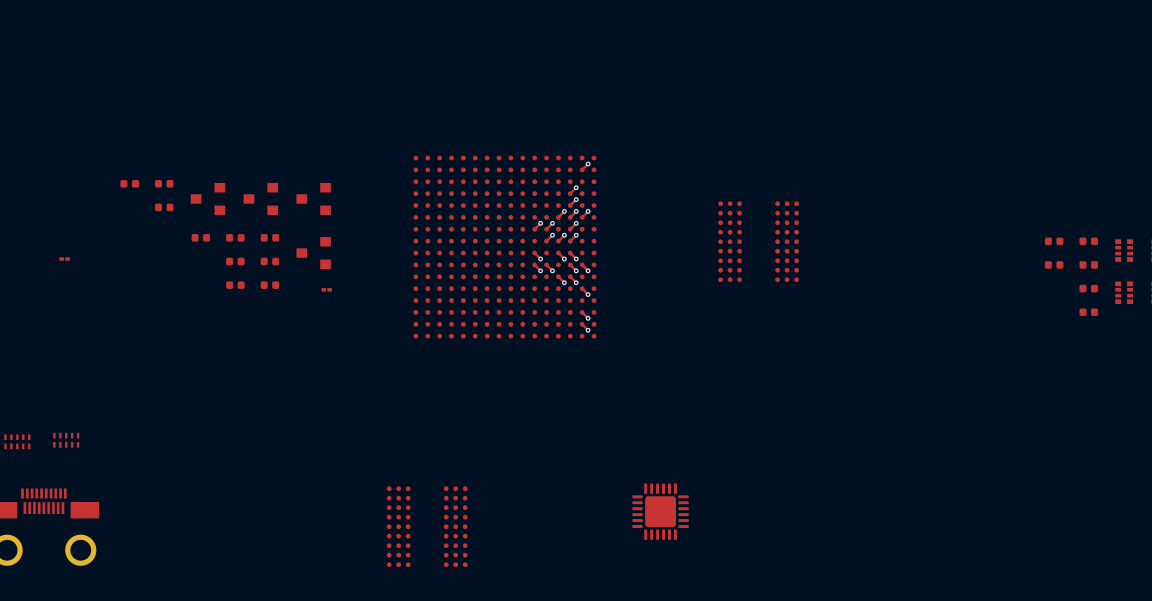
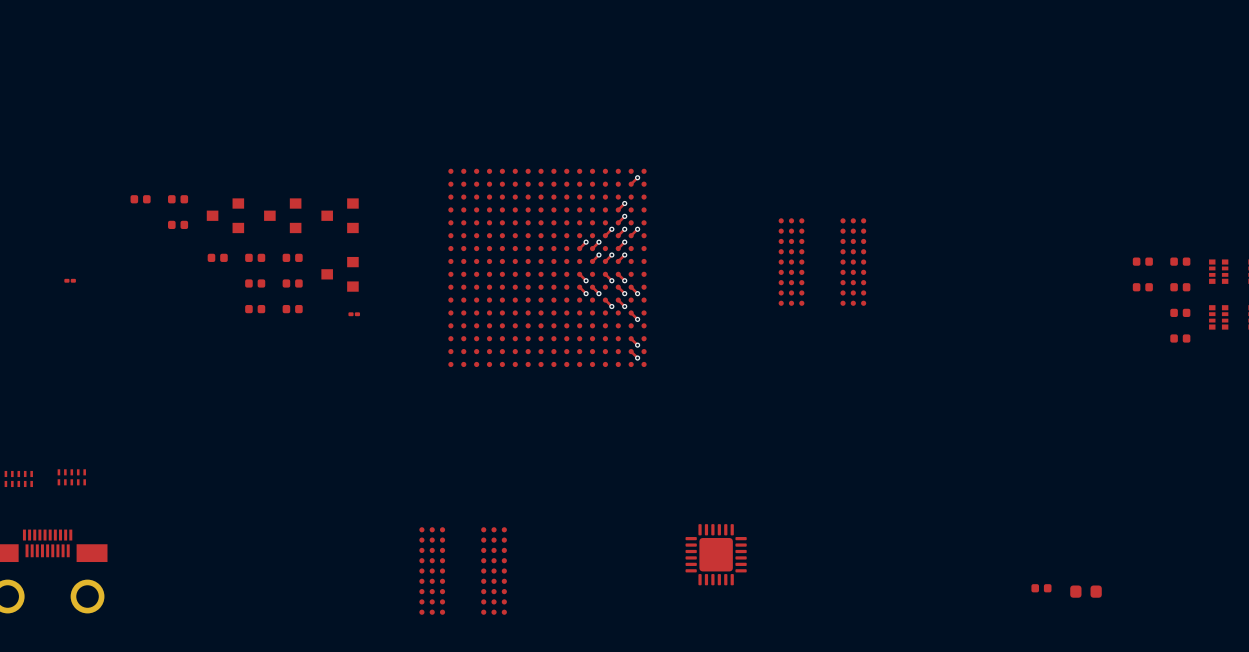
part: none -> (1041, 588)
part: none -> (1086, 591)

